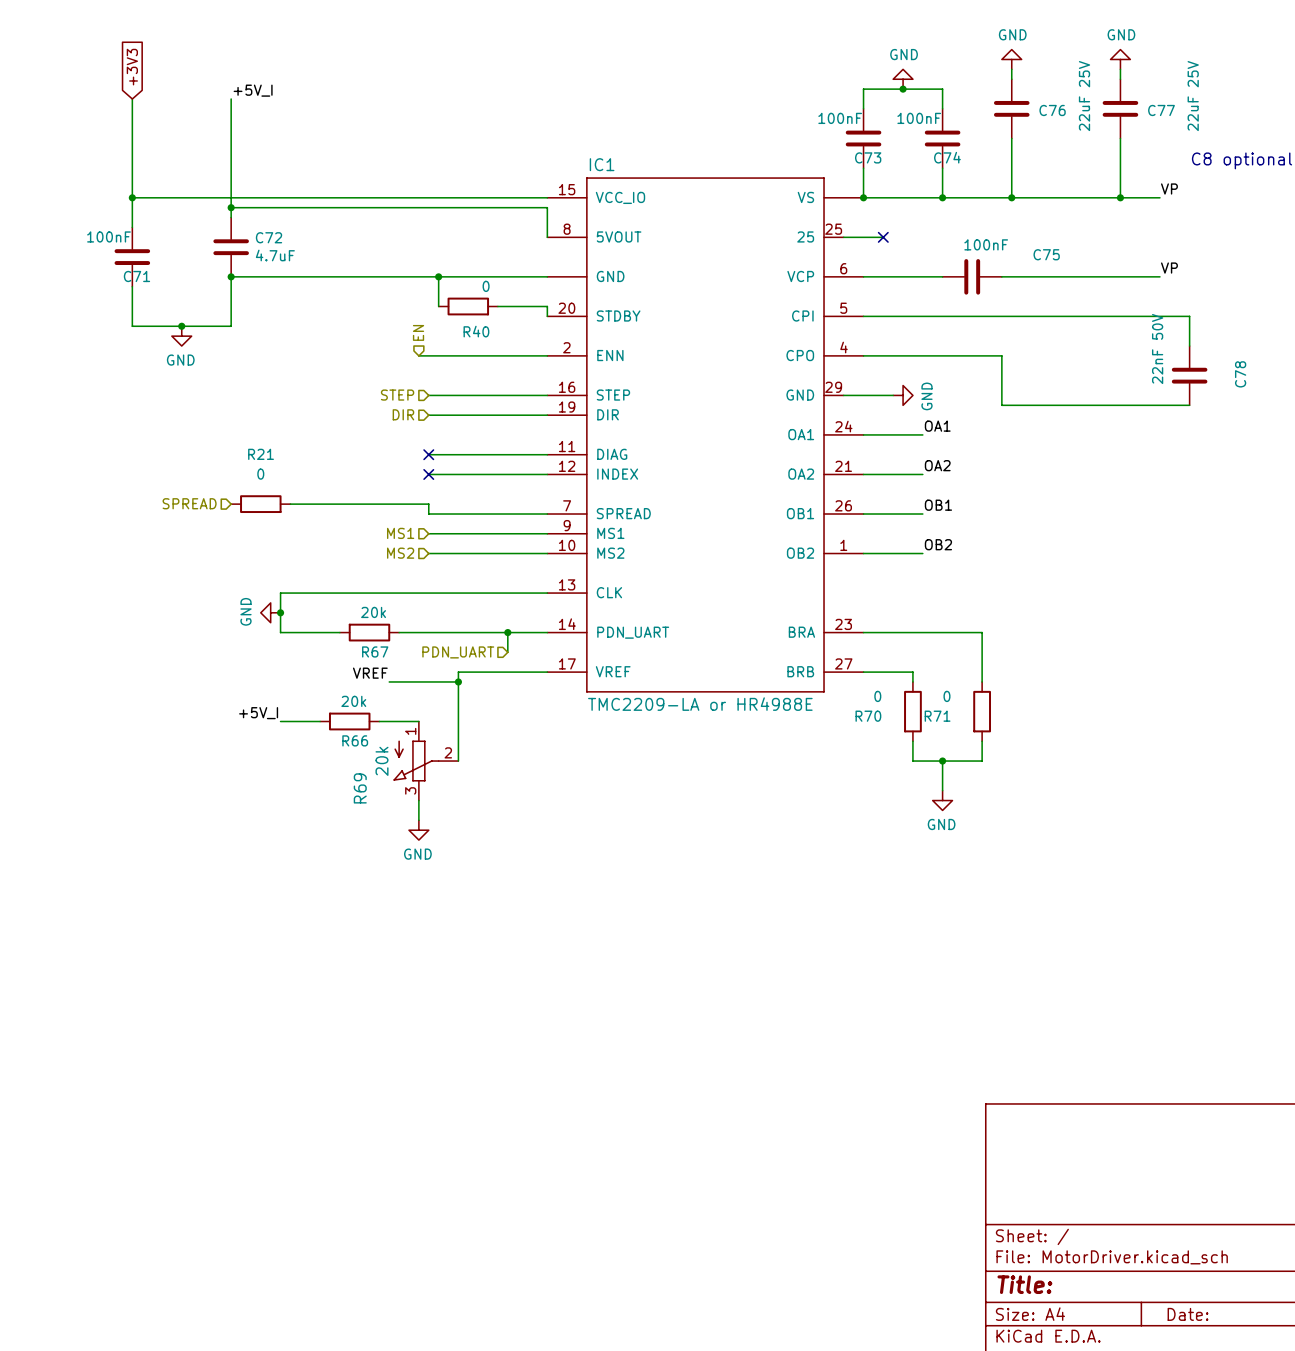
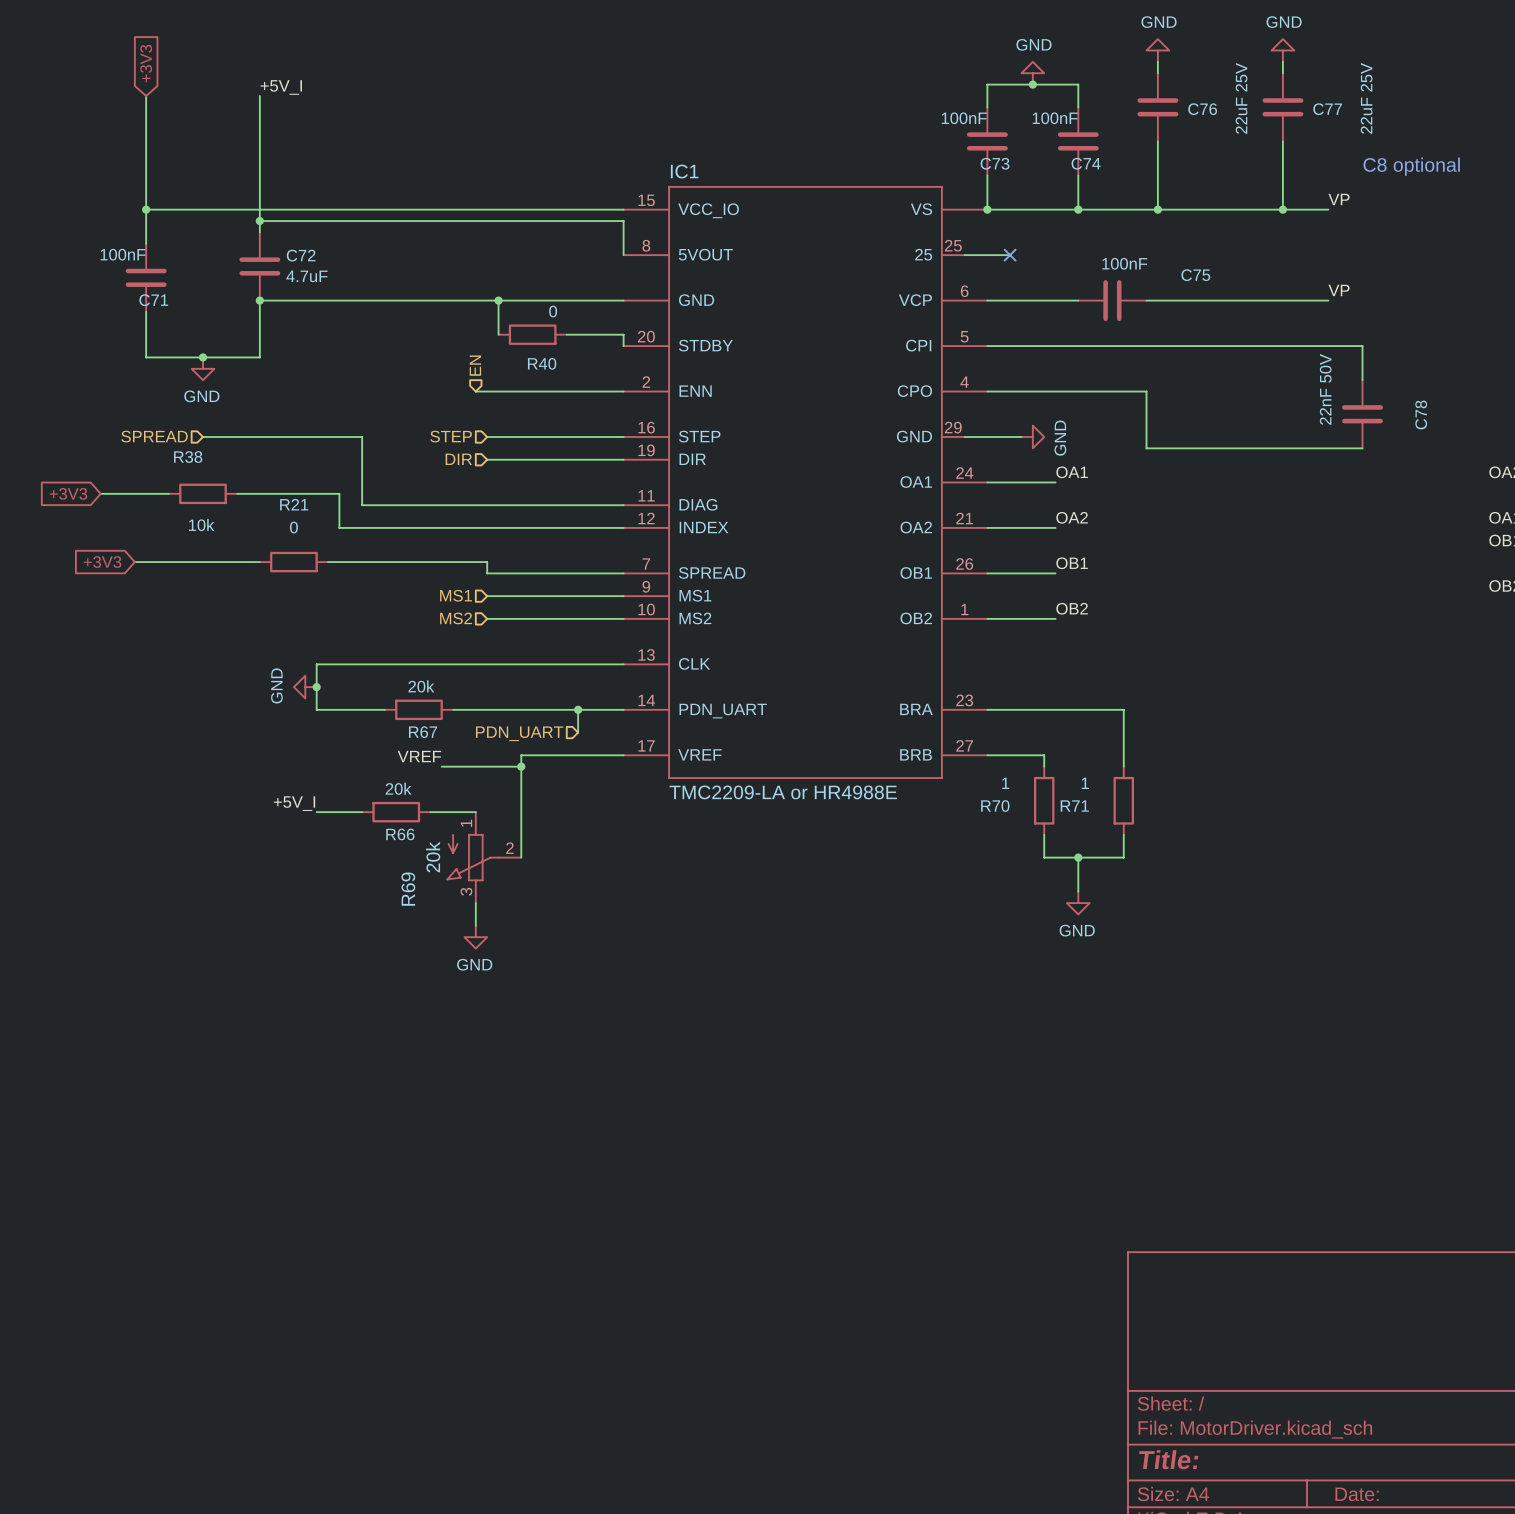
wire: none -> (202, 437) (362, 437) (362, 505) (487, 505)
global label: none -> +3V3 (68, 493)
wire: none -> (100, 493) (168, 493)
R38: none -> 10k (202, 493)
wire: none -> (237, 493) (339, 493) (339, 527) (487, 527)
no-connect mark: (428, 454) -> none
no-connect mark: (428, 474) -> none
hierarchical label position: SPREAD (189, 503) -> SPREAD (154, 436)
global label: none -> +3V3 (102, 562)
wire: none -> (134, 562) (259, 562)
R70 value: 0 (877, 696) -> 1 (1005, 783)
R71 value: 0 (946, 696) -> 1 (1085, 783)

